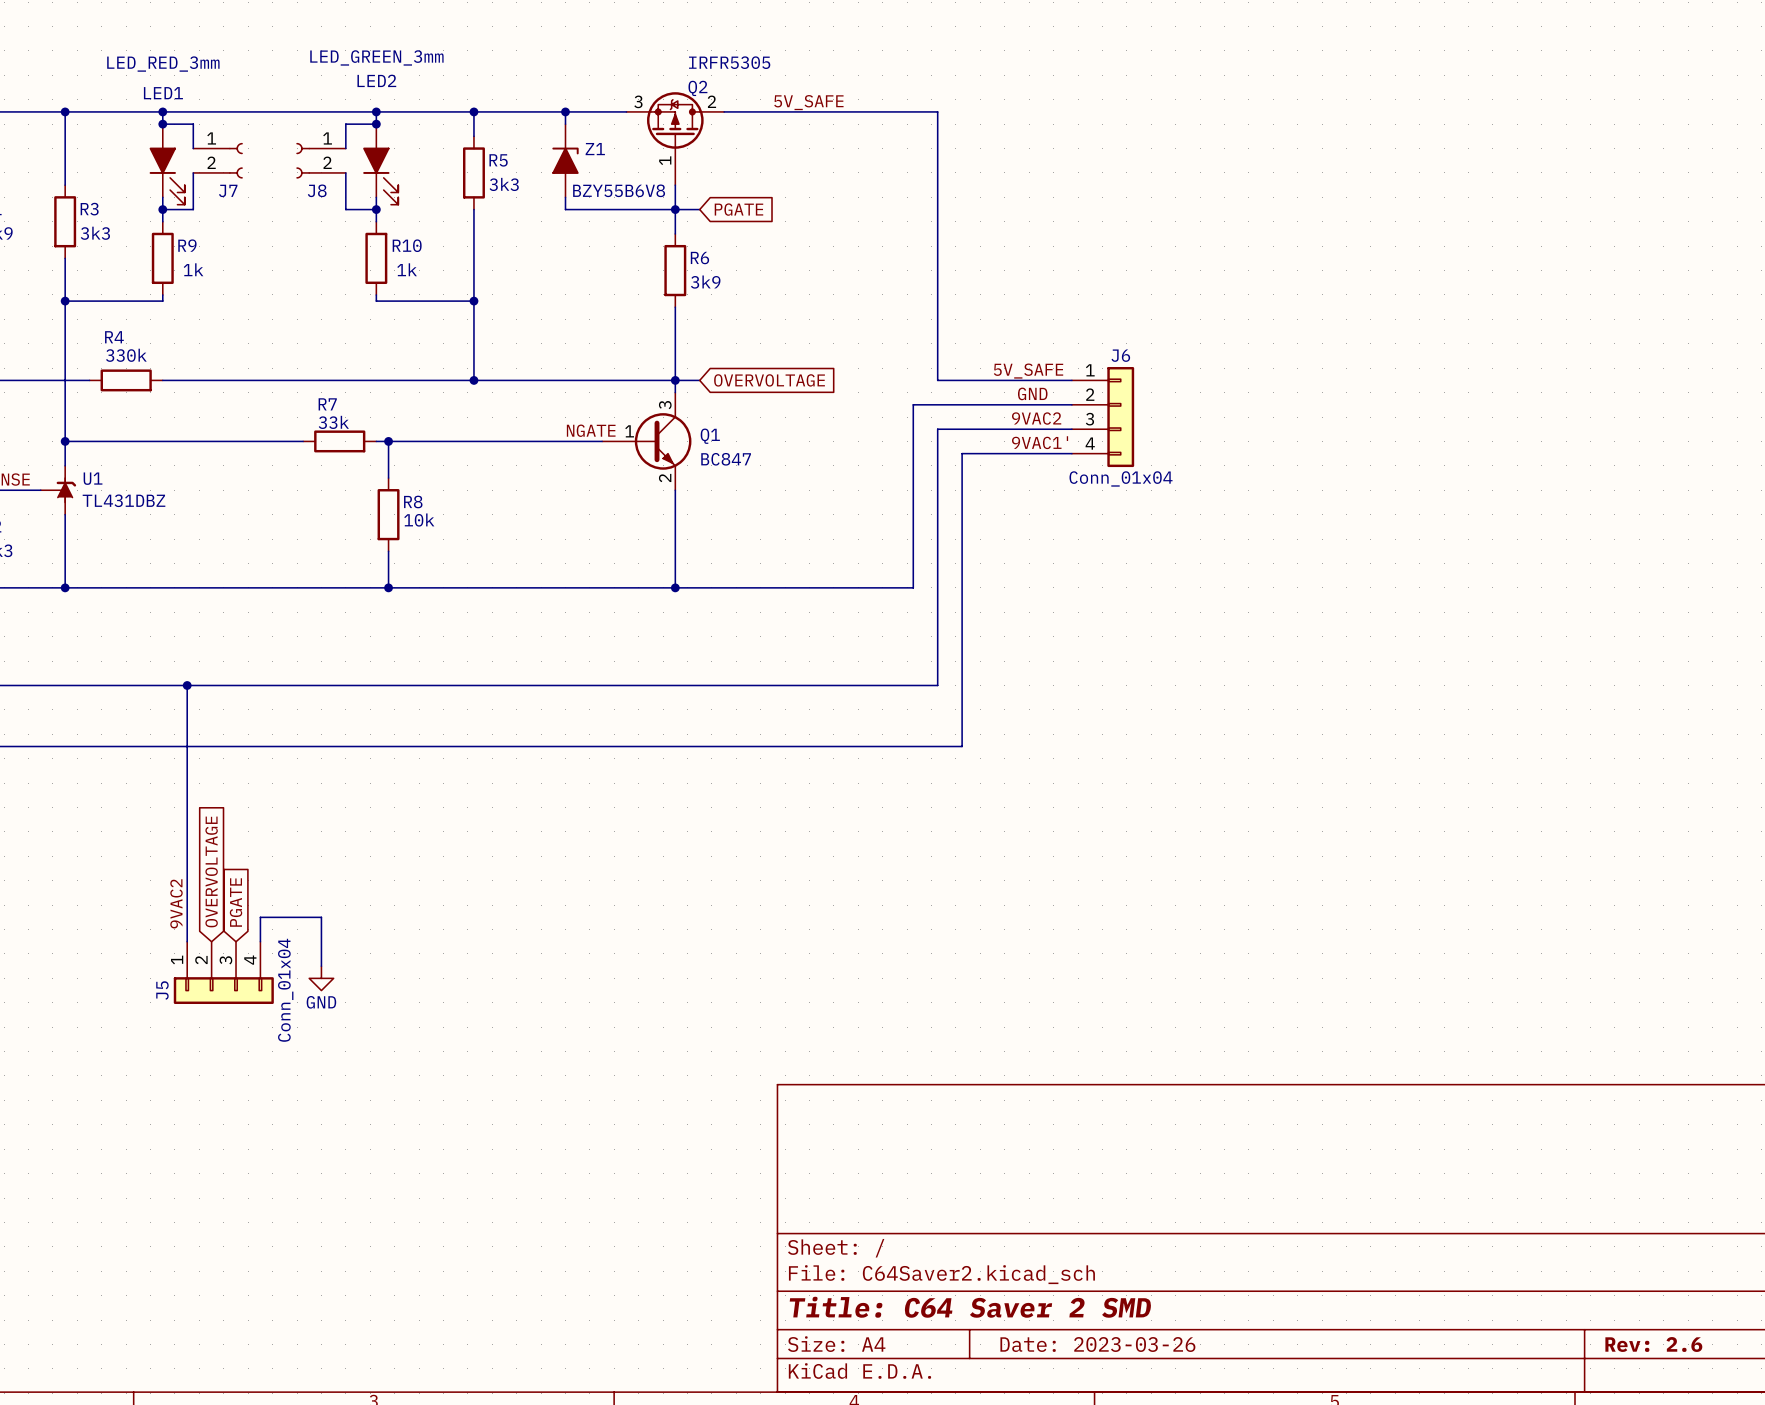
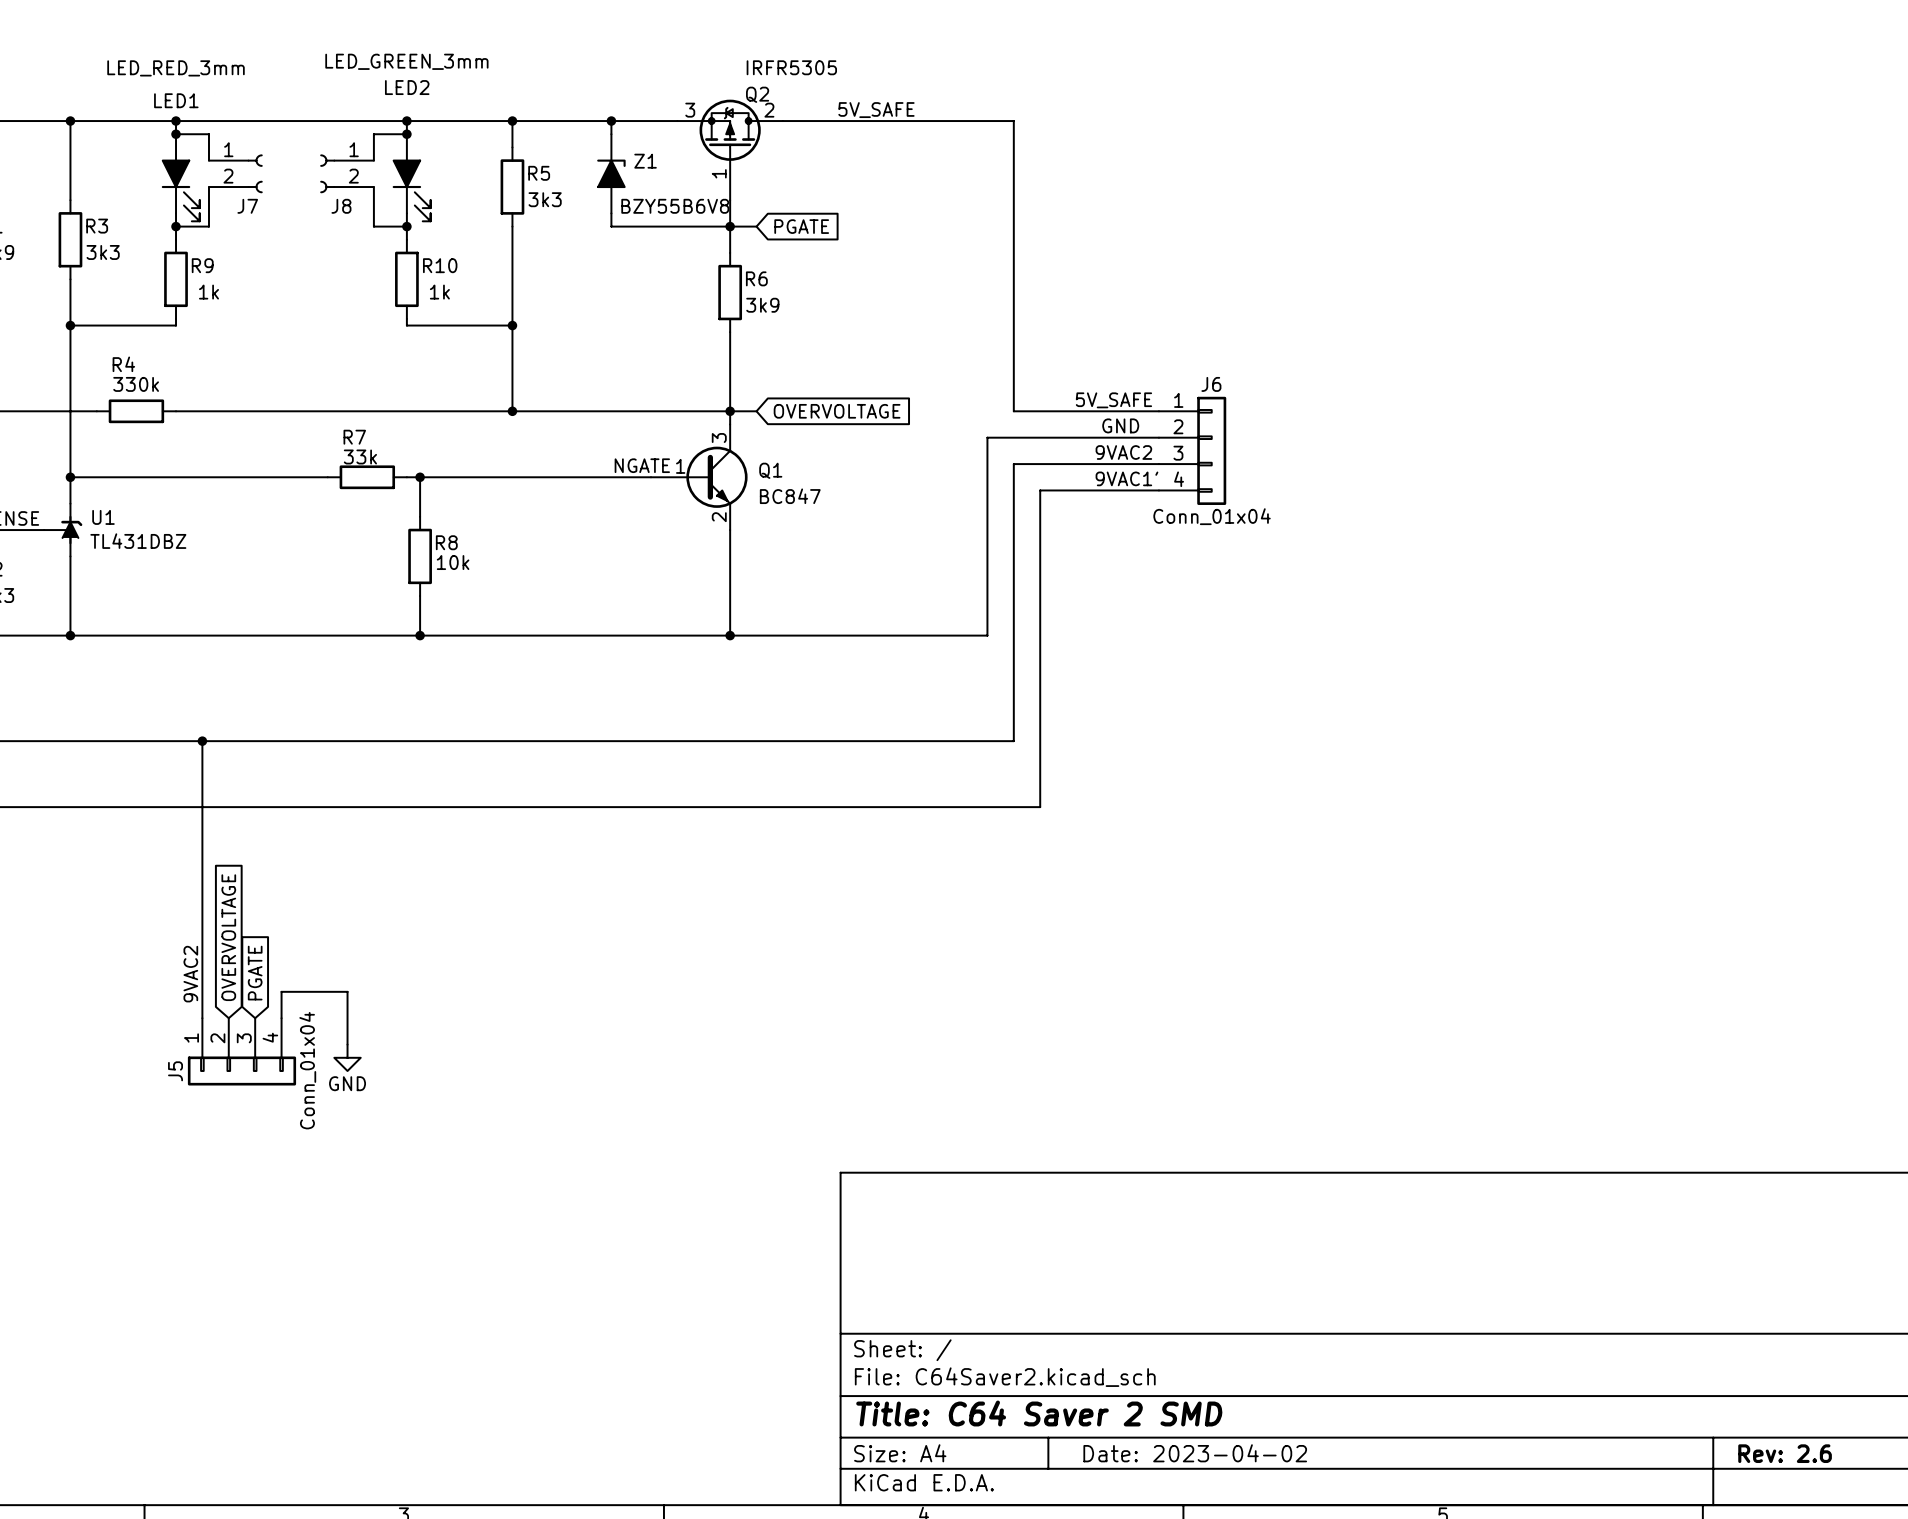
title block: Date: 2023-03-26 (1097, 1344) -> Date: 2023-04-02 (1195, 1453)

